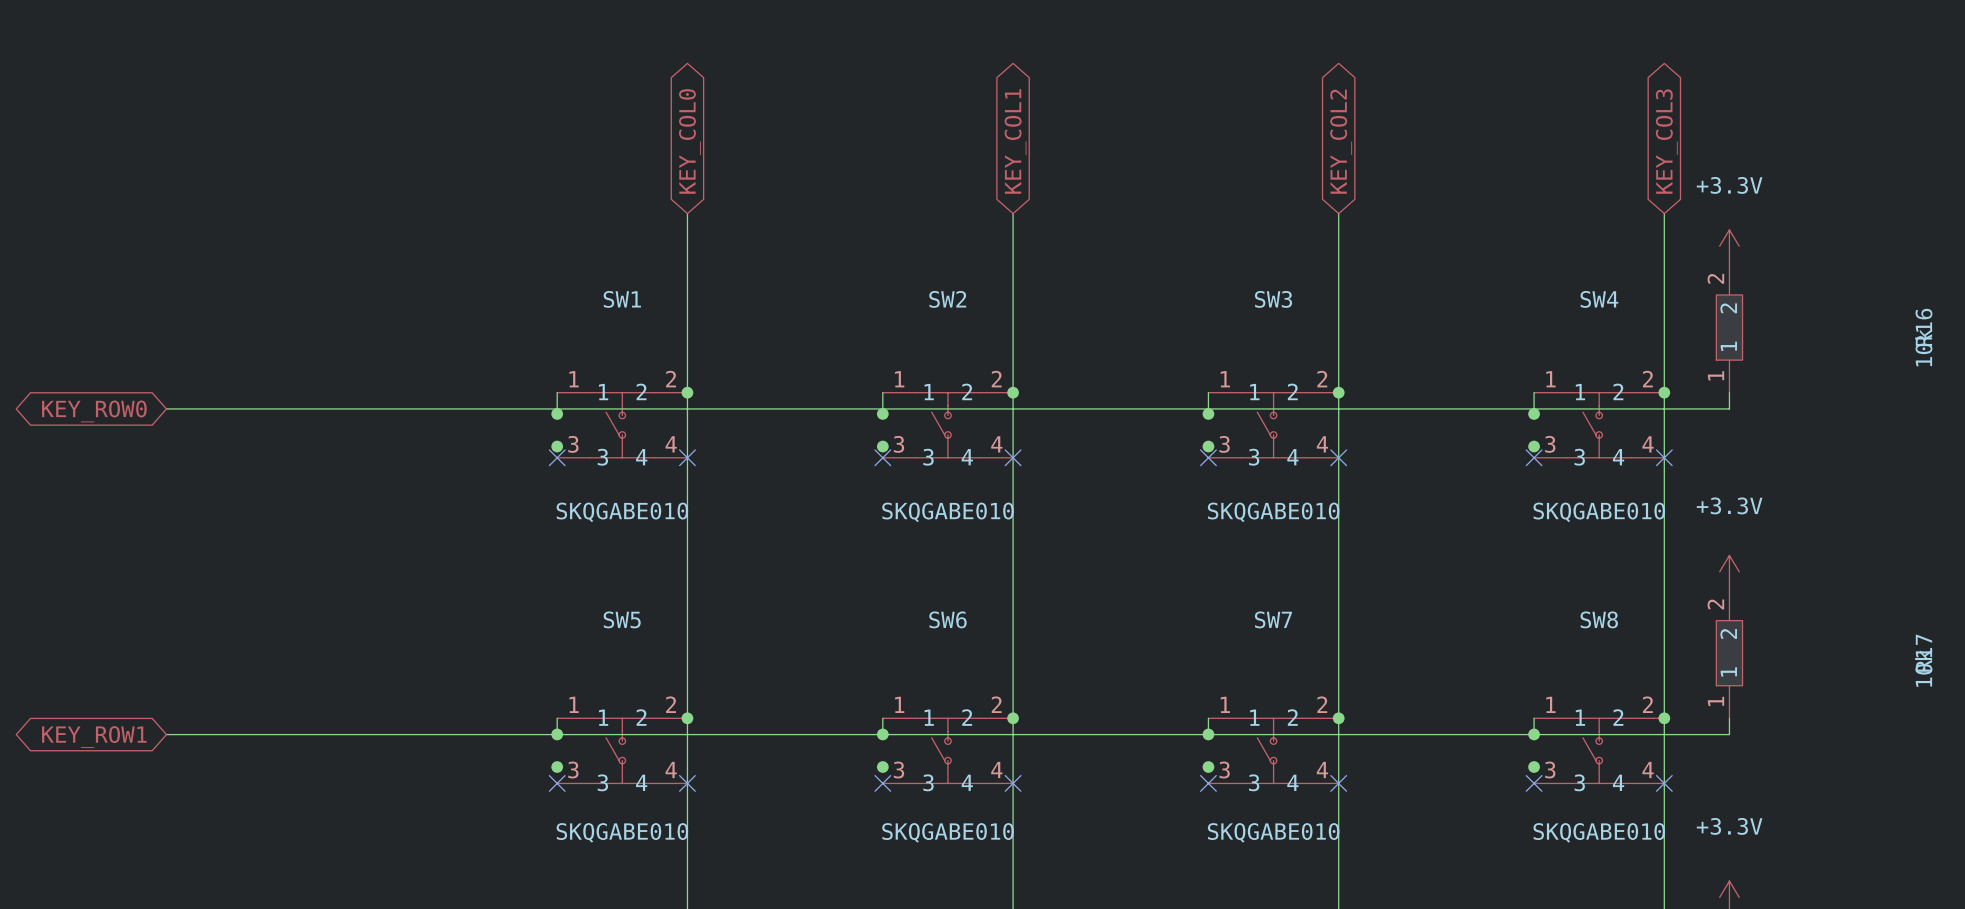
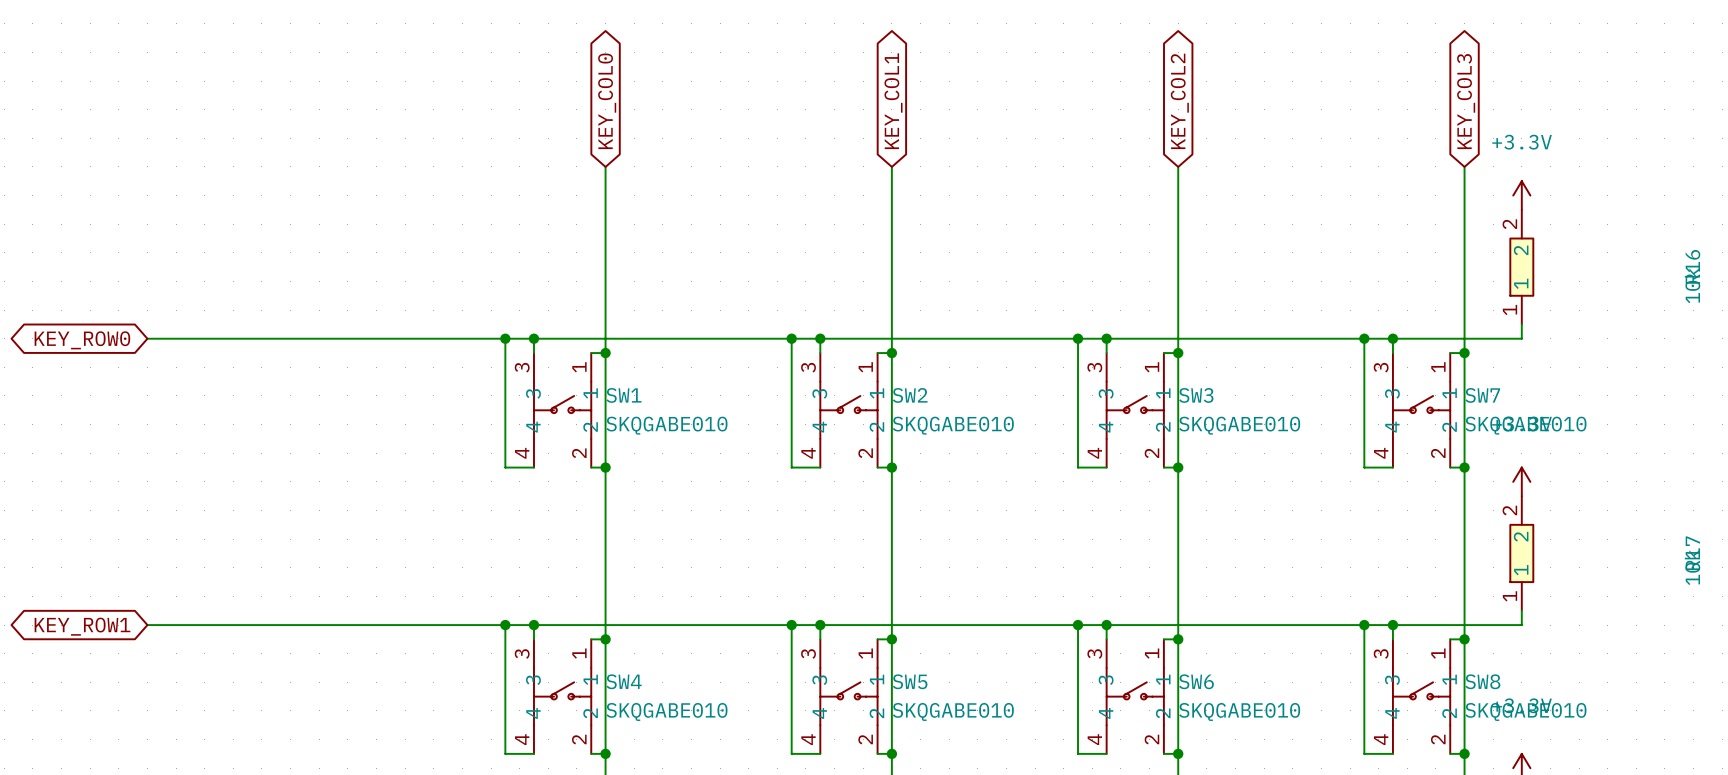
SW1 name position: SW1 (622, 299) -> SW1 (624, 395)
SW2 name position: SW2 (947, 299) -> SW2 (910, 395)
SW3 name position: SW3 (1273, 299) -> SW3 (1196, 395)
SW4 name position: SW4 (1599, 299) -> SW4 (624, 681)
wire: (557, 392) (557, 408) -> (533, 338) (533, 353)
junction position: (687, 392) -> (605, 353)
wire: (882, 392) (882, 408) -> (820, 338) (820, 353)
junction position: (1013, 392) -> (891, 353)
wire: (1208, 392) (1208, 408) -> (1106, 338) (1106, 353)
junction position: (1338, 392) -> (1178, 353)
wire: (1534, 392) (1534, 408) -> (1392, 338) (1392, 353)
junction position: (1664, 392) -> (1464, 353)
wire: none -> (505, 338) (505, 467) (533, 467)
junction: none -> (533, 338)
wire: none -> (791, 338) (791, 467) (820, 467)
junction: none -> (820, 338)
wire: none -> (1078, 338) (1078, 467) (1106, 467)
junction: none -> (1106, 338)
wire: none -> (1364, 338) (1364, 467) (1392, 467)
junction: none -> (1392, 338)
junction position: (557, 413) -> (505, 338)
junction position: (882, 413) -> (791, 338)
junction position: (1208, 413) -> (1078, 338)
junction position: (1534, 413) -> (1364, 338)
SW1 rotation: 0° (622, 425) -> 90° clockwise (562, 410)
wire: none -> (591, 353) (605, 353)
SW2 rotation: 0° (947, 425) -> 90° clockwise (848, 410)
wire: none -> (877, 353) (891, 353)
SW3 rotation: 0° (1273, 425) -> 90° clockwise (1135, 410)
wire: none -> (1163, 353) (1178, 353)
SW4 rotation: 0° (1599, 425) -> 90° clockwise (562, 696)
SW4 position: (1599, 425) -> (562, 696)
wire: none -> (1450, 353) (1464, 353)
junction: (557, 446) -> none
junction: (882, 446) -> none
junction: (1208, 446) -> none
junction: (1534, 446) -> none
no-connect mark: (557, 457) -> none
no-connect mark: (687, 457) -> none
no-connect mark: (882, 457) -> none
no-connect mark: (1013, 457) -> none
no-connect mark: (1208, 457) -> none
no-connect mark: (1338, 457) -> none
no-connect mark: (1534, 457) -> none
no-connect mark: (1664, 457) -> none
SW1 value position: SKQGABE010 (622, 512) -> SKQGABE010 (666, 425)
SW2 value position: SKQGABE010 (947, 512) -> SKQGABE010 (953, 425)
SW3 value position: SKQGABE010 (1273, 512) -> SKQGABE010 (1239, 425)
SW4 value position: SKQGABE010 (1599, 512) -> SKQGABE010 (666, 711)
wire: none -> (591, 467) (605, 467)
junction: none -> (605, 467)
wire: none -> (877, 467) (891, 467)
junction: none -> (891, 467)
wire: none -> (1163, 467) (1178, 467)
junction: none -> (1178, 467)
wire: none -> (1450, 467) (1464, 467)
junction: none -> (1464, 467)
SW5 name position: SW5 (622, 619) -> SW5 (910, 681)
SW6 name position: SW6 (947, 619) -> SW6 (1196, 681)
SW7 name position: SW7 (1273, 619) -> SW7 (1482, 395)
SW8 name position: SW8 (1599, 619) -> SW8 (1482, 681)
wire: (557, 718) (557, 734) -> (533, 625) (533, 639)
junction position: (687, 718) -> (605, 639)
wire: (882, 718) (882, 734) -> (820, 625) (820, 639)
junction position: (1013, 718) -> (891, 639)
wire: (1208, 718) (1208, 734) -> (1106, 625) (1106, 639)
junction position: (1338, 718) -> (1178, 639)
wire: (1534, 718) (1534, 734) -> (1392, 625) (1392, 639)
junction position: (1664, 718) -> (1464, 639)
junction position: (557, 734) -> (505, 625)
wire: none -> (505, 625) (505, 753) (533, 753)
junction: none -> (533, 625)
junction position: (882, 734) -> (791, 625)
wire: none -> (791, 625) (791, 753) (820, 753)
junction: none -> (820, 625)
junction position: (1208, 734) -> (1078, 625)
wire: none -> (1078, 625) (1078, 753) (1106, 753)
junction: none -> (1106, 625)
junction position: (1534, 734) -> (1364, 625)
wire: none -> (1364, 625) (1364, 753) (1392, 753)
junction: none -> (1392, 625)
SW5 rotation: 0° (622, 750) -> 90° clockwise (848, 696)
SW5 position: (622, 750) -> (848, 696)
wire: none -> (591, 639) (605, 639)
SW6 rotation: 0° (947, 750) -> 90° clockwise (1135, 696)
SW6 position: (947, 750) -> (1135, 696)
wire: none -> (877, 639) (891, 639)
SW7 rotation: 0° (1273, 750) -> 90° clockwise (1421, 410)
SW7 position: (1273, 750) -> (1421, 410)
wire: none -> (1163, 639) (1178, 639)
SW8 rotation: 0° (1599, 750) -> 90° clockwise (1421, 696)
wire: none -> (1450, 639) (1464, 639)
junction: (557, 767) -> none
junction: (882, 767) -> none
junction: (1208, 767) -> none
junction: (1534, 767) -> none
no-connect mark: (557, 783) -> none
no-connect mark: (687, 783) -> none
no-connect mark: (882, 783) -> none
no-connect mark: (1013, 783) -> none
no-connect mark: (1208, 783) -> none
no-connect mark: (1338, 783) -> none
no-connect mark: (1534, 783) -> none
no-connect mark: (1664, 783) -> none
SW5 value position: SKQGABE010 (622, 832) -> SKQGABE010 (953, 711)
SW6 value position: SKQGABE010 (947, 832) -> SKQGABE010 (1239, 711)
SW7 value position: SKQGABE010 (1273, 832) -> SKQGABE010 (1525, 425)
SW8 value position: SKQGABE010 (1599, 832) -> SKQGABE010 (1525, 711)
wire: none -> (591, 753) (605, 753)
junction: none -> (605, 753)
wire: none -> (877, 753) (891, 753)
junction: none -> (891, 753)
wire: none -> (1163, 753) (1178, 753)
junction: none -> (1178, 753)
wire: none -> (1450, 753) (1464, 753)
junction: none -> (1464, 753)

